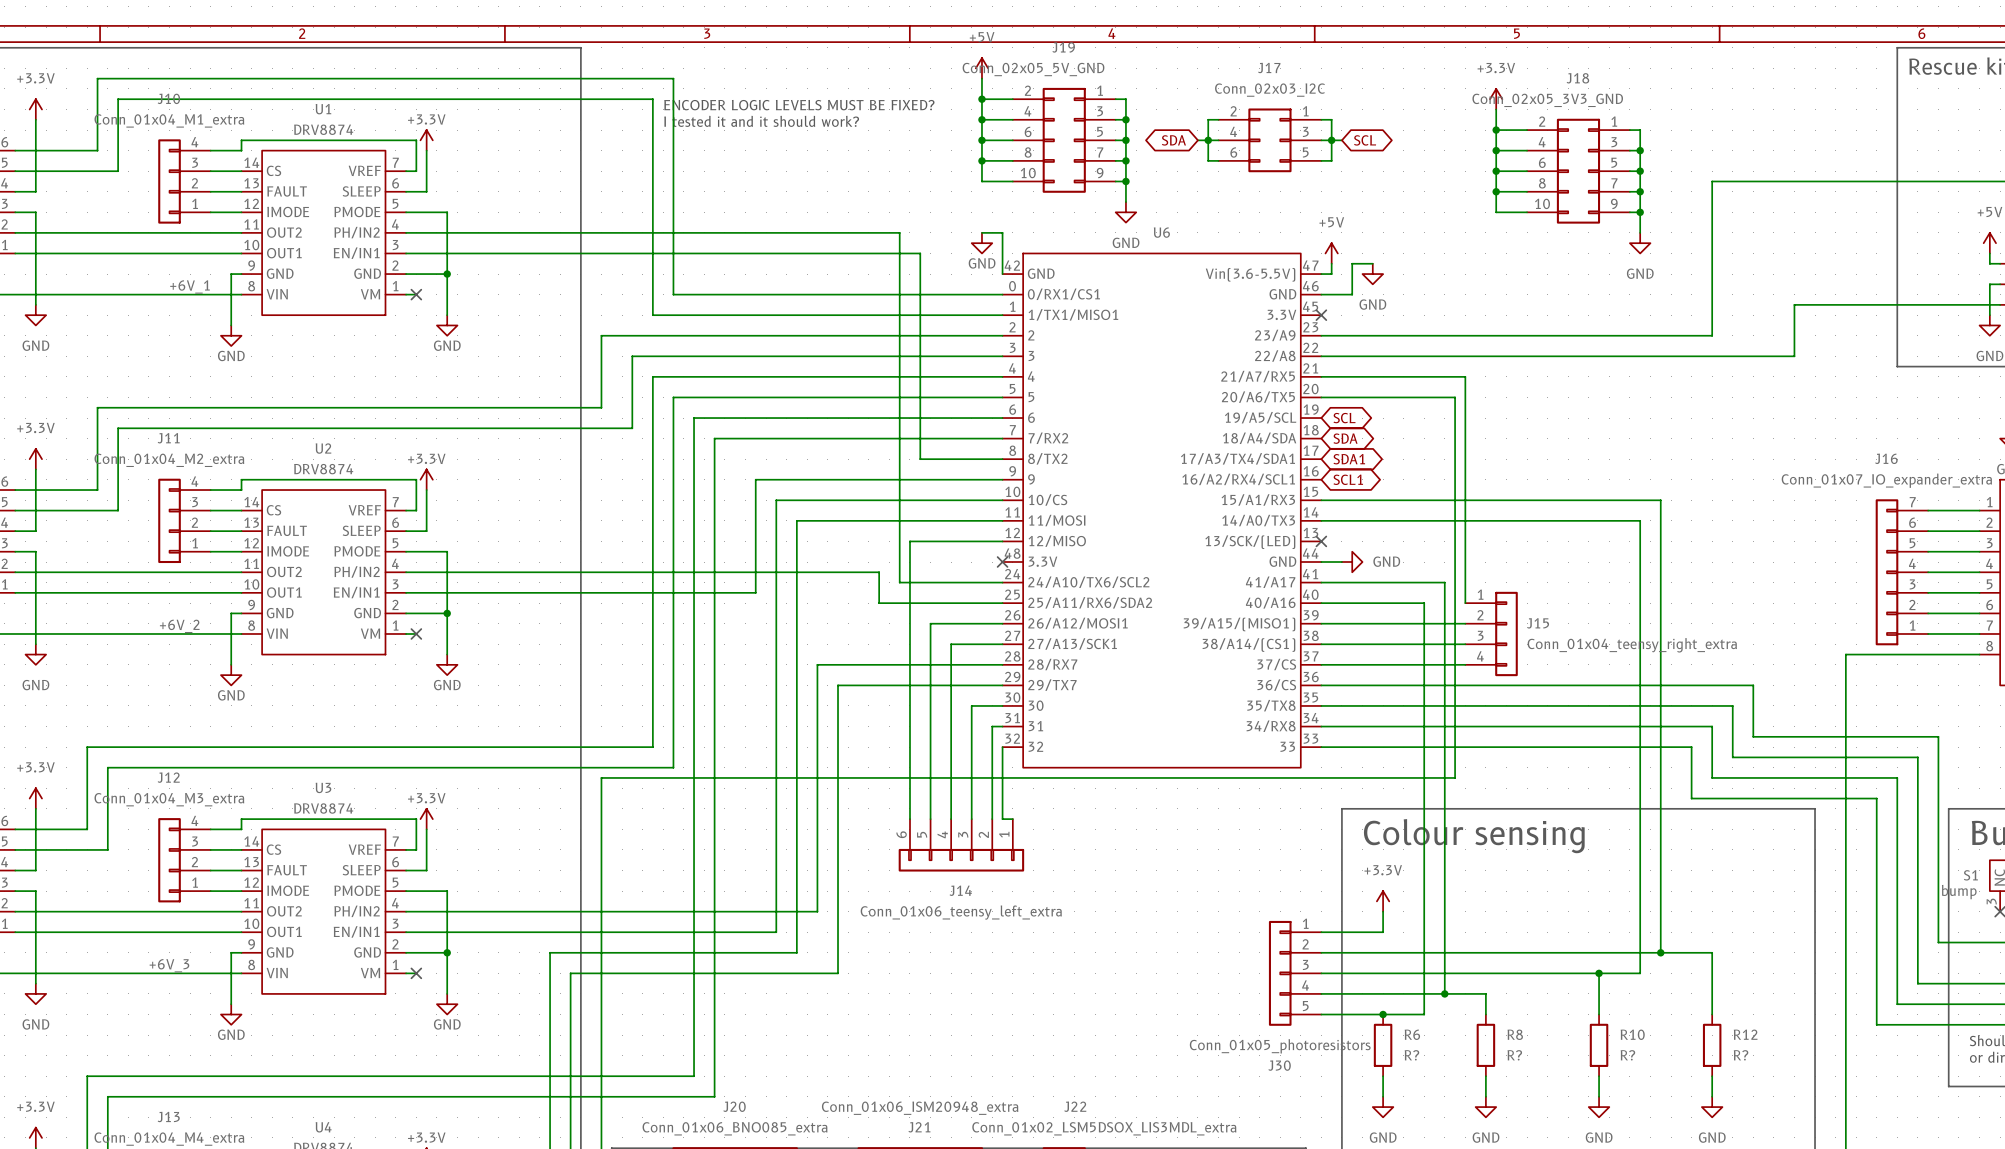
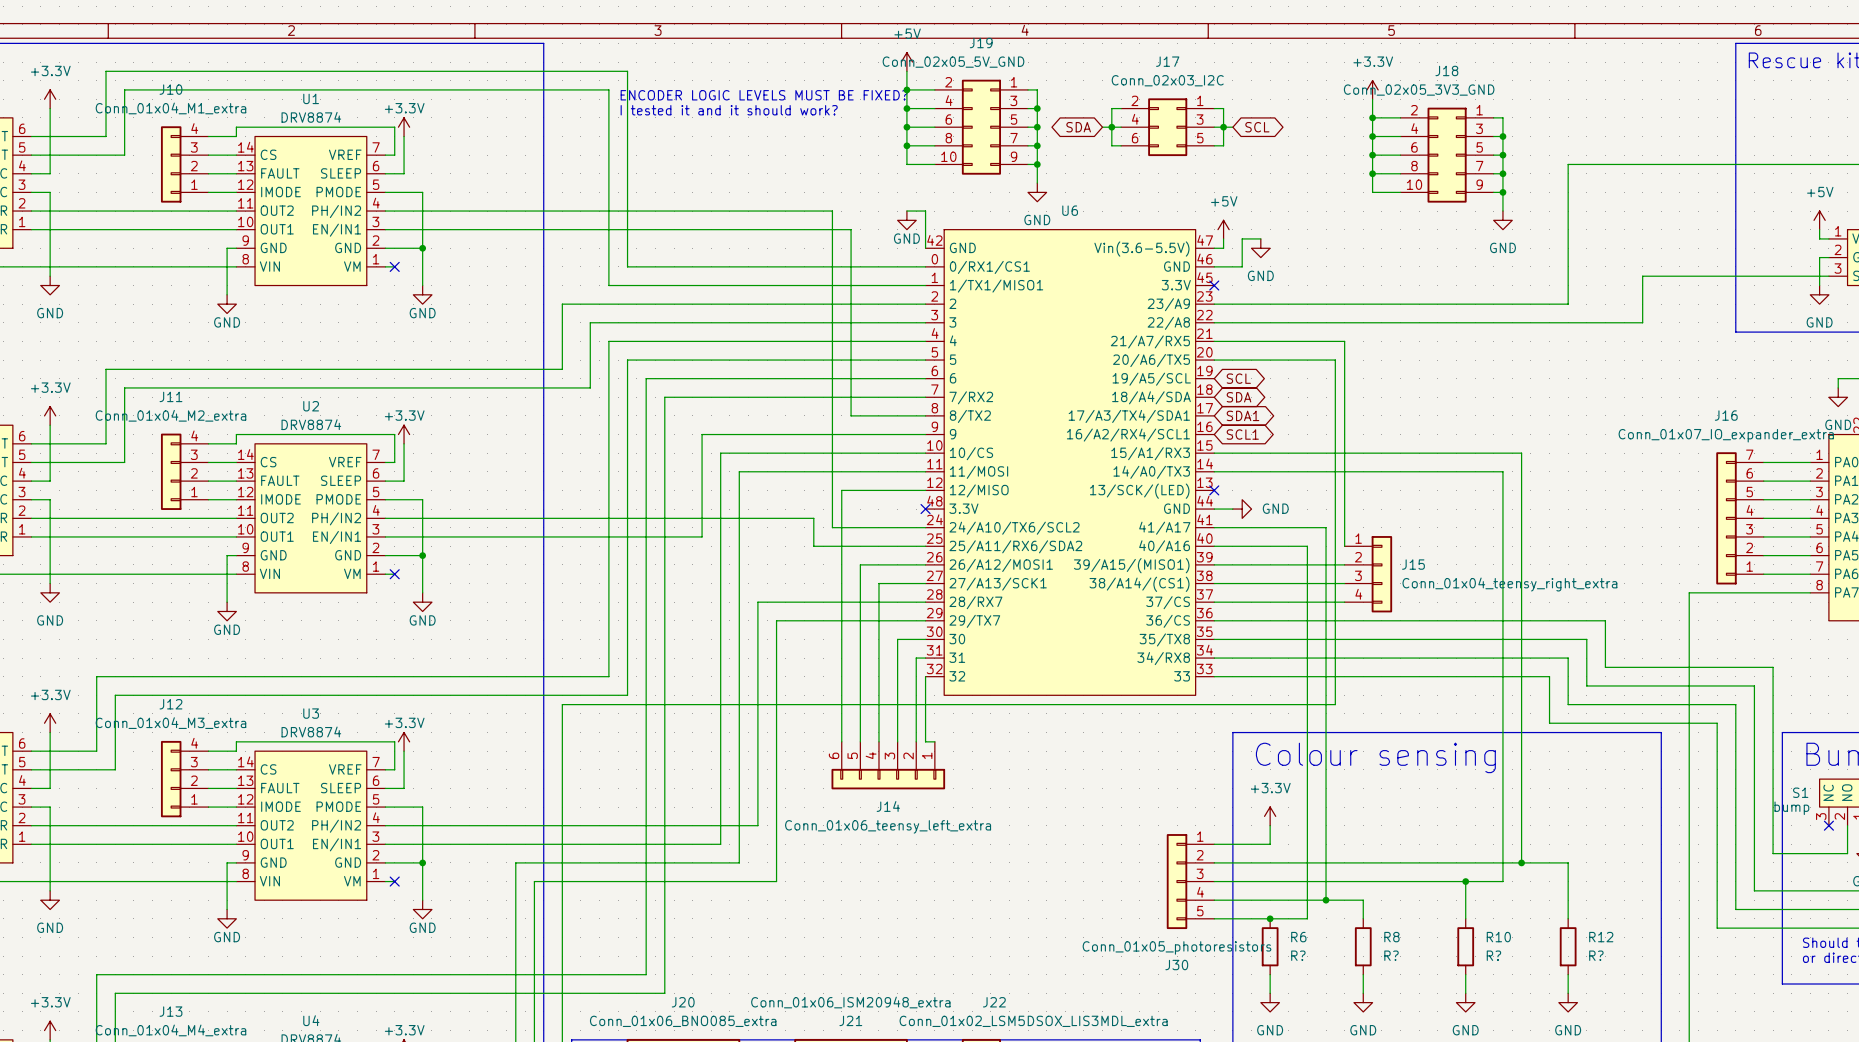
label: +6V_1 (189, 286) -> none
label: +6V_2 (179, 626) -> none
label: +6V_3 (169, 965) -> none

